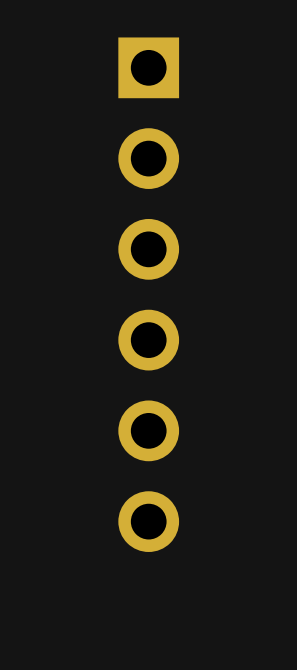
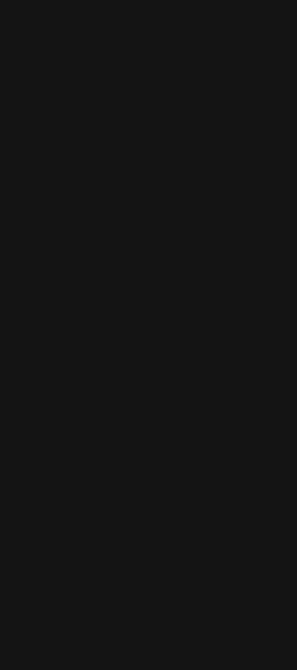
part: (148, 294) -> none

